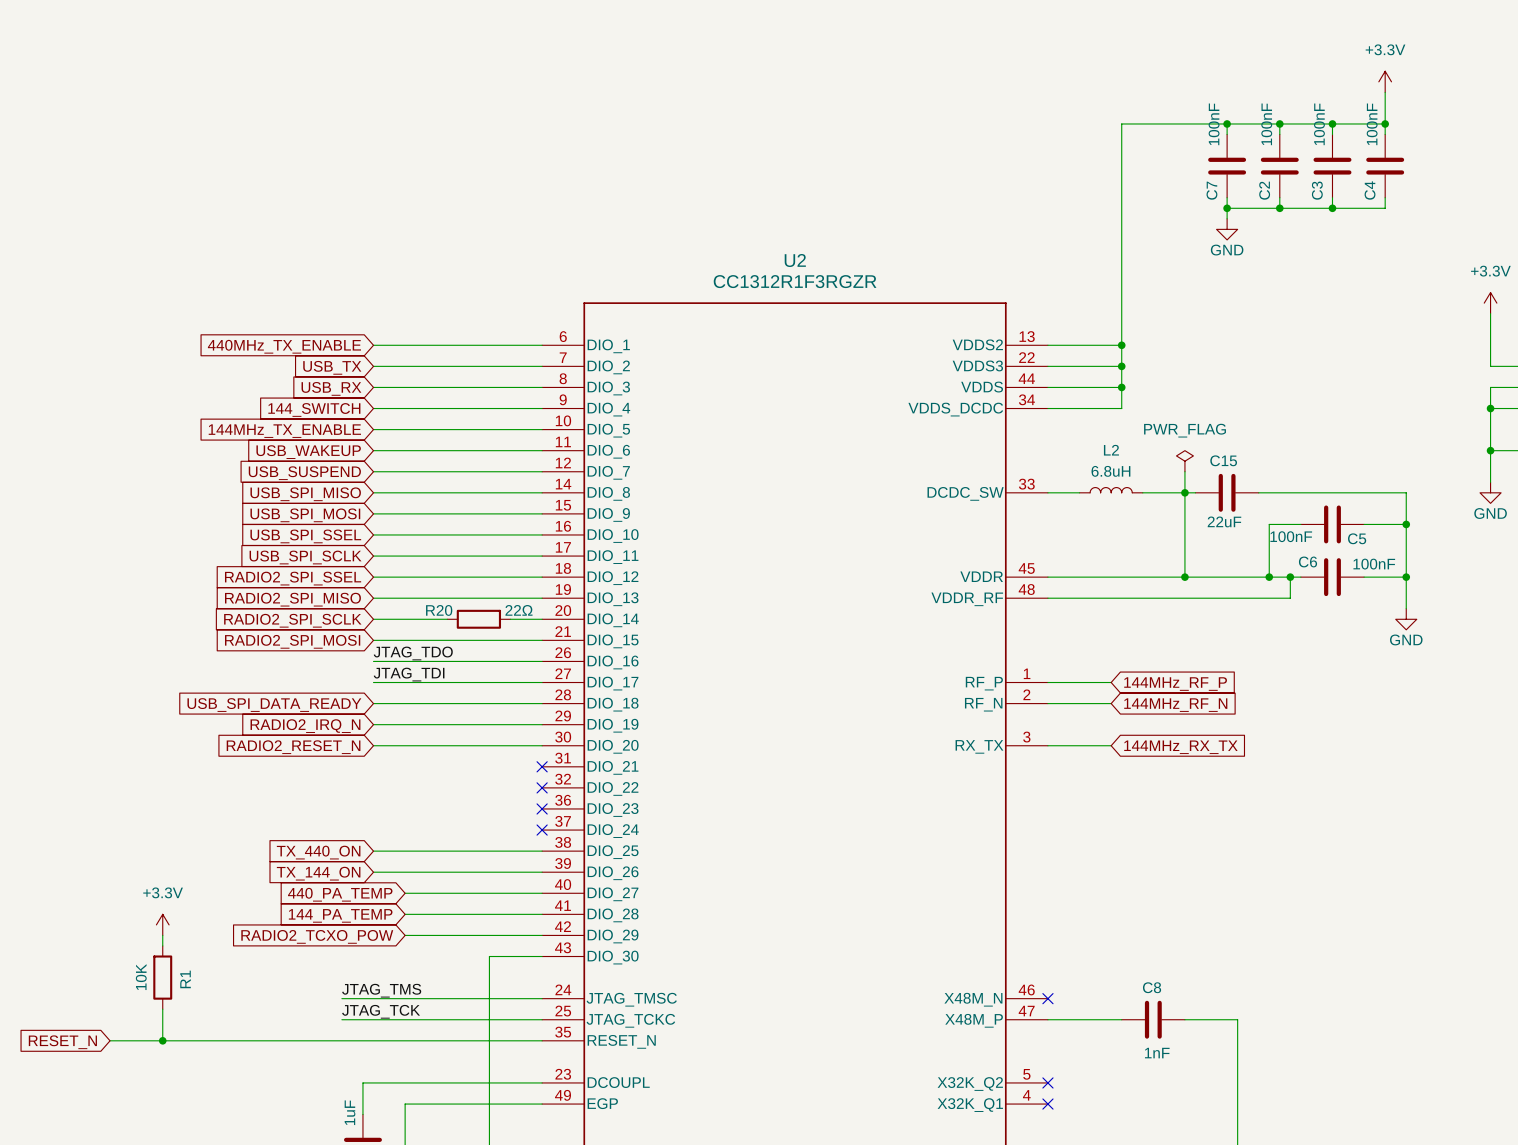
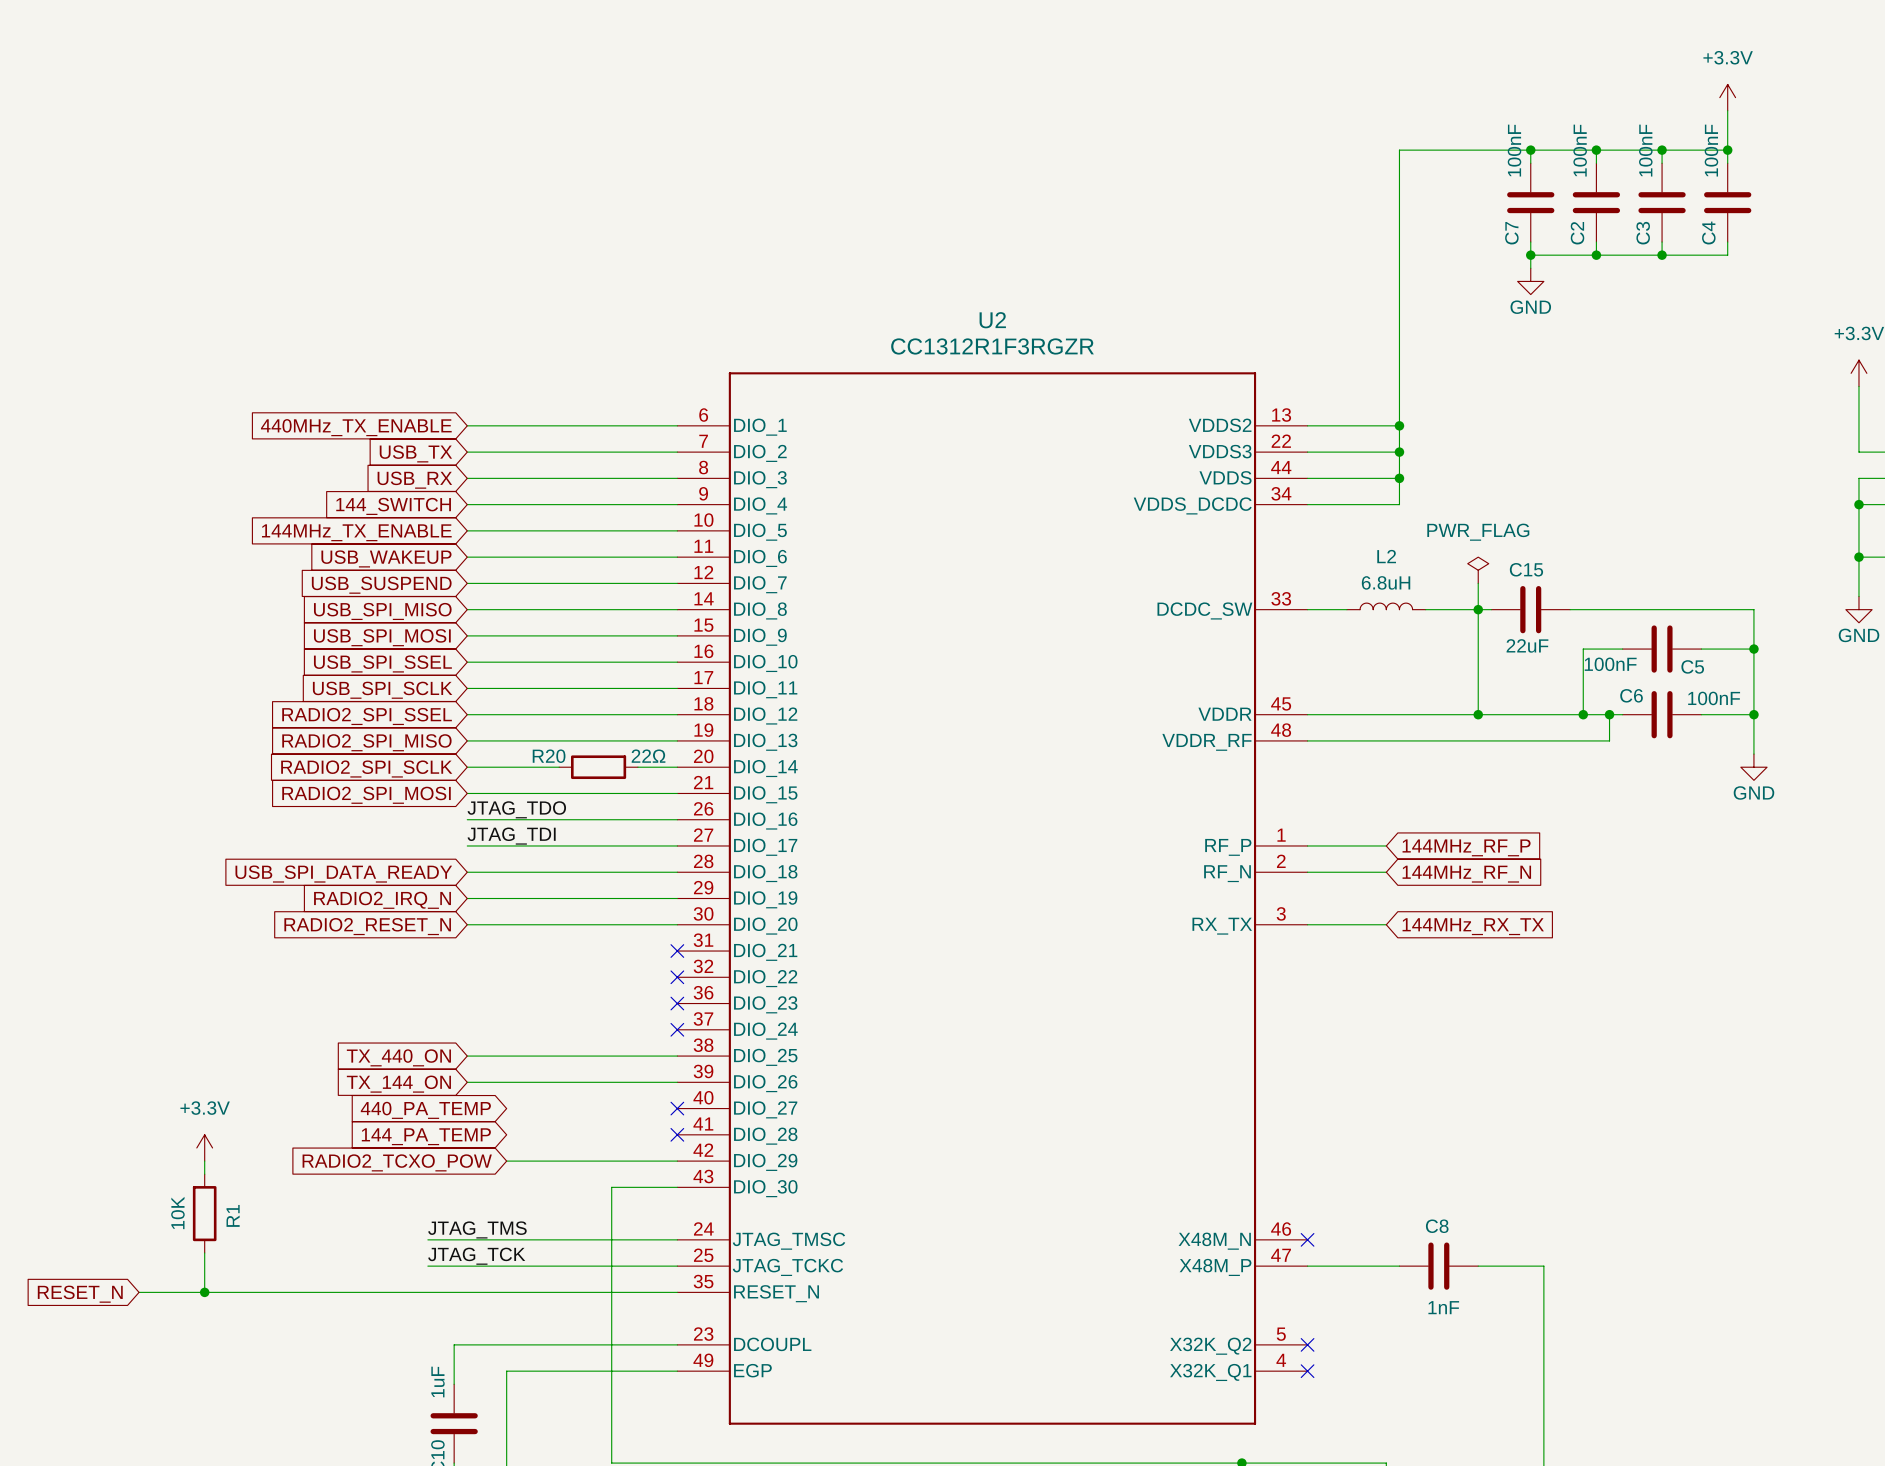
wire: (405, 893) (542, 893) -> none
no-connect mark: none -> (677, 1108)
wire: (405, 914) (542, 914) -> none
no-connect mark: none -> (677, 1134)

